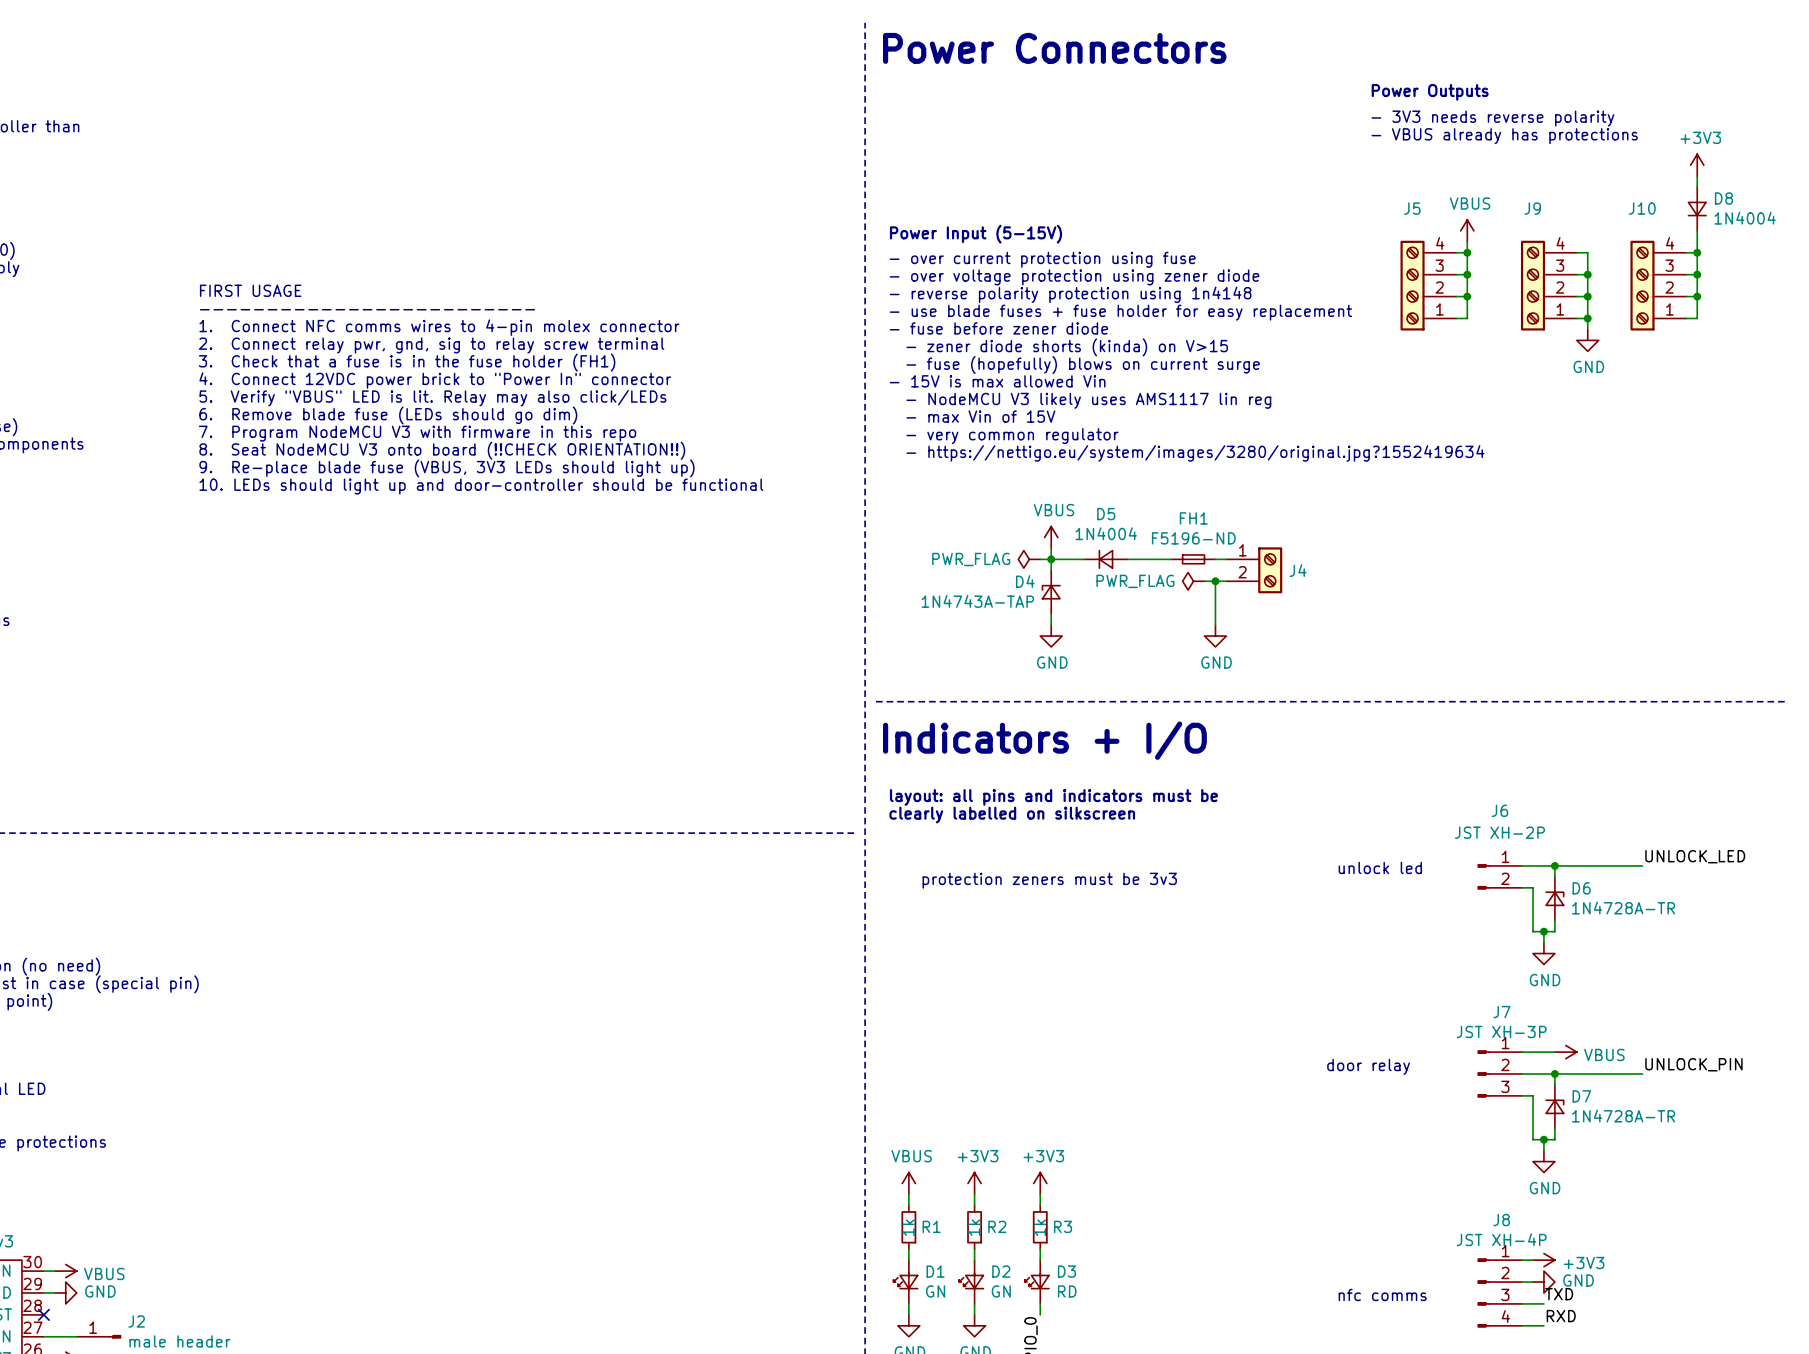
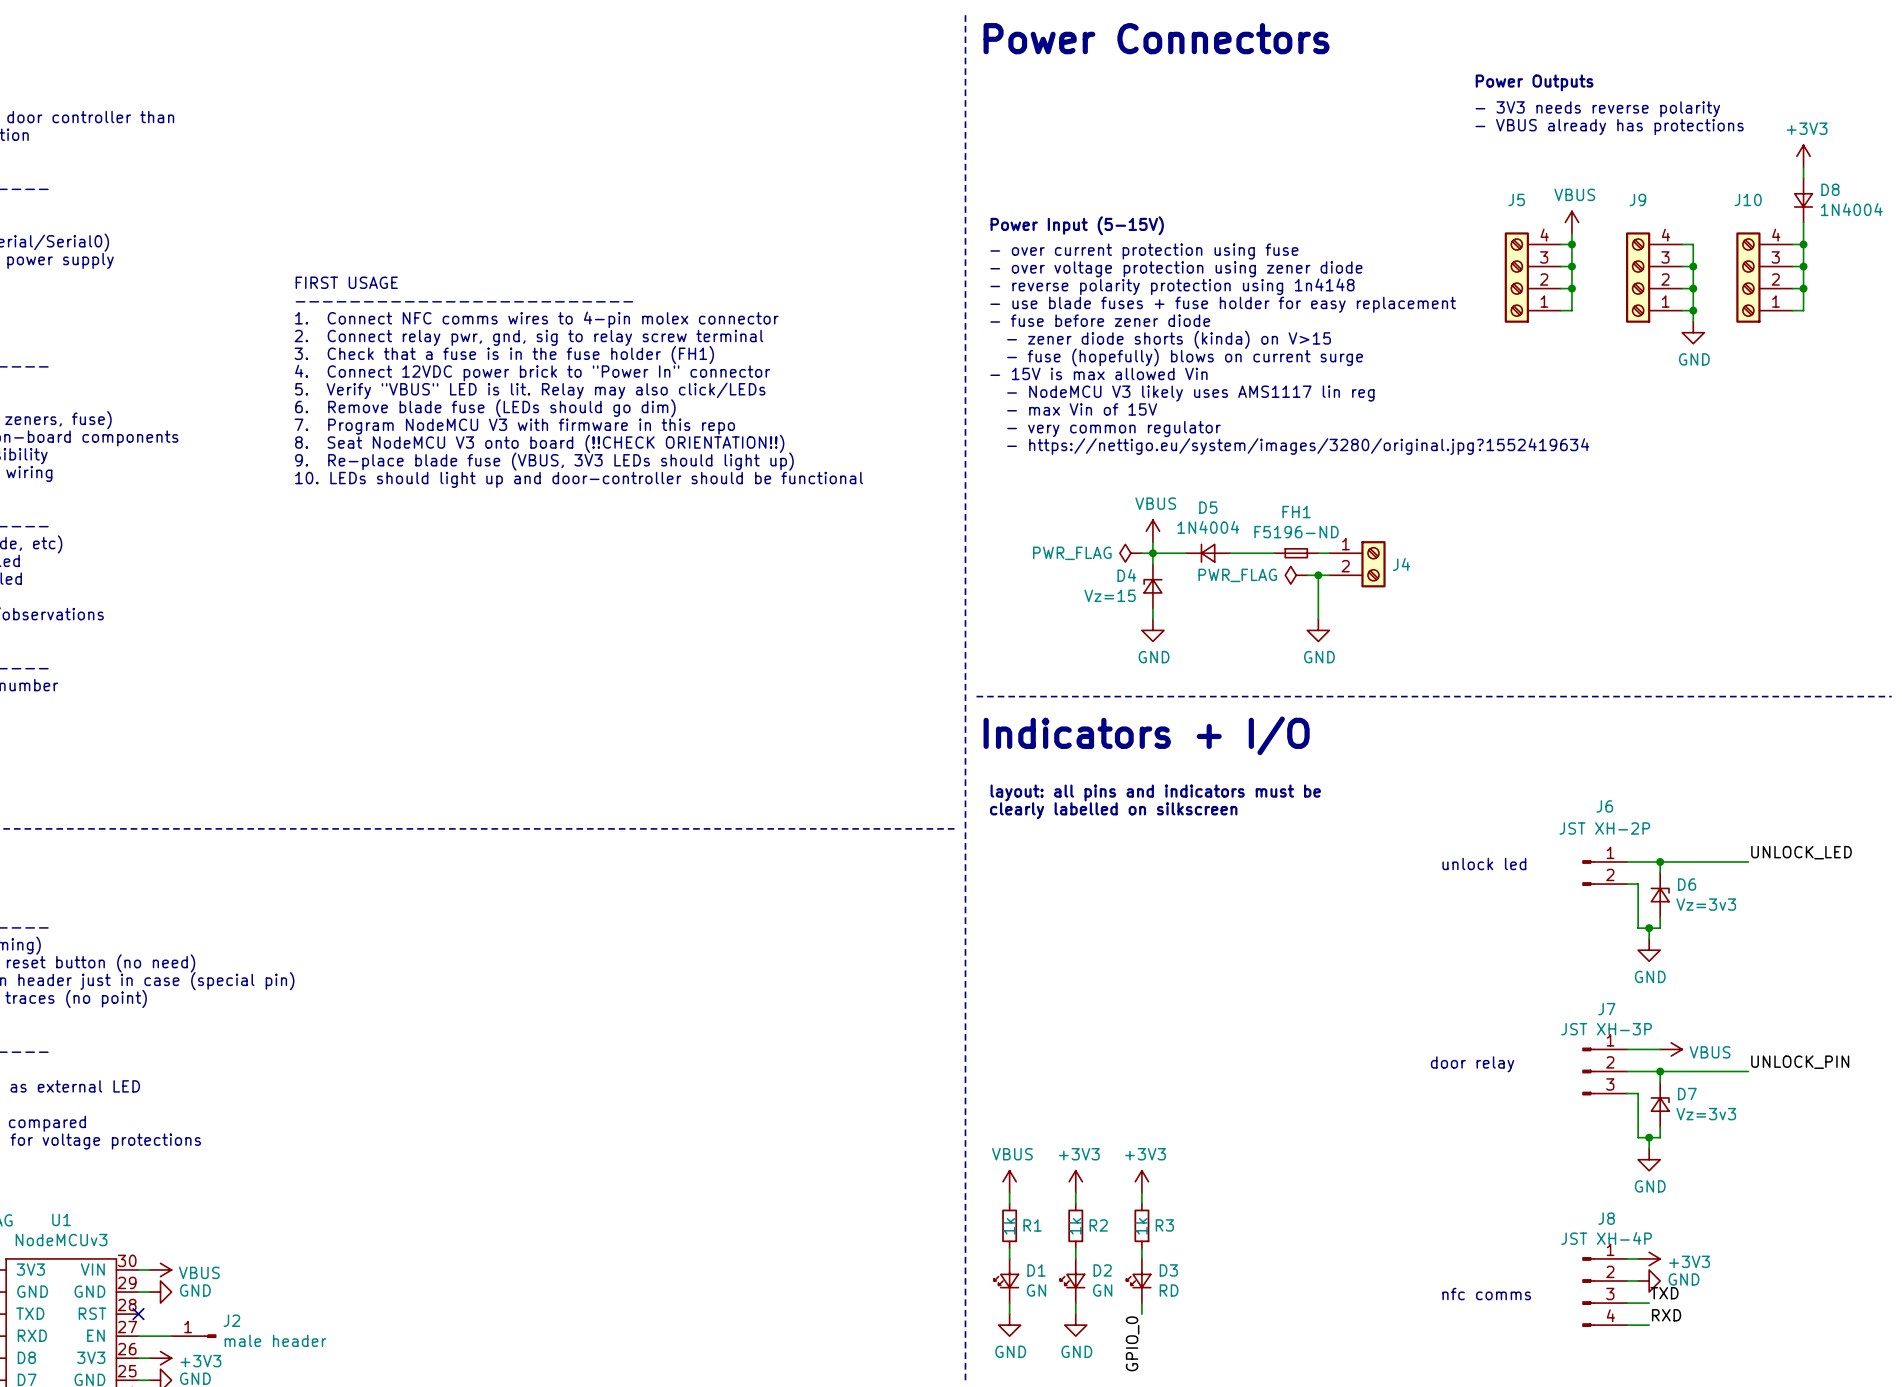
D4 value: 1N4743A-TAP (977, 601) -> Vz=15 (1110, 595)
text: protection zeners must be 3v3 (1049, 880) -> none
D6 value: 1N4728A-TR (1623, 907) -> Vz=3v3 (1706, 904)
D7 value: 1N4728A-TR (1623, 1116) -> Vz=3v3 (1706, 1114)

